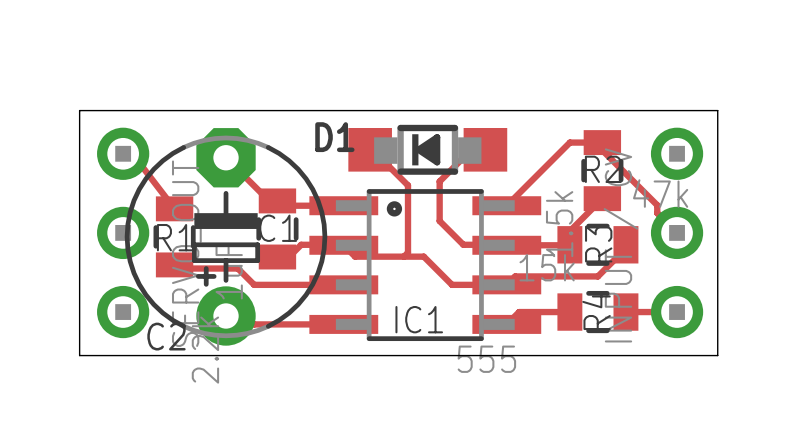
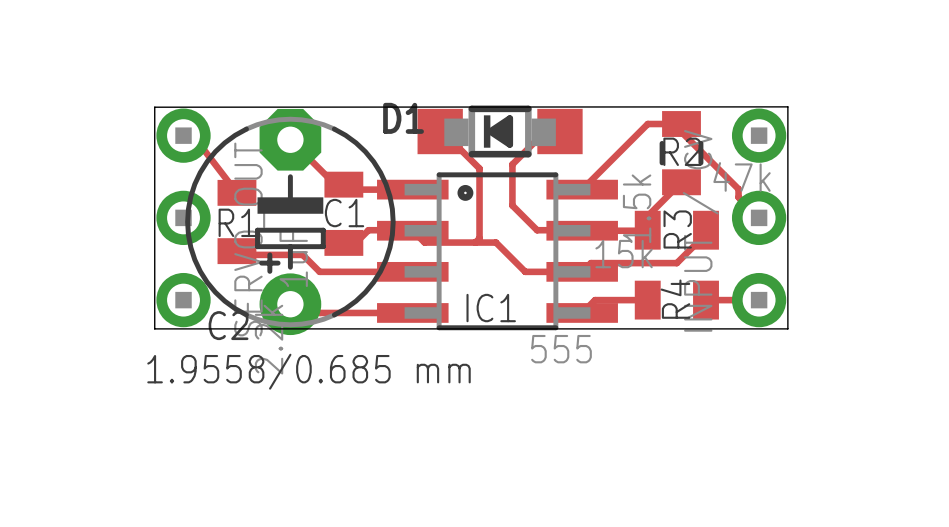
board edge: (79, 110) (717, 110) (717, 355) (79, 355) (79, 110) -> (787, 106) (154, 107) (154, 328) (787, 328) (787, 106)
C1 footprint: [256, 188, 299, 270] -> [324, 171, 364, 256]
R1 footprint: [153, 196, 196, 278] -> [217, 179, 257, 265]
R3 footprint: [557, 223, 639, 266] -> [634, 210, 719, 250]
R4 footprint: [557, 290, 639, 334] -> [634, 280, 719, 320]
text: none -> 1.9558/0.685 mm (308, 371)

